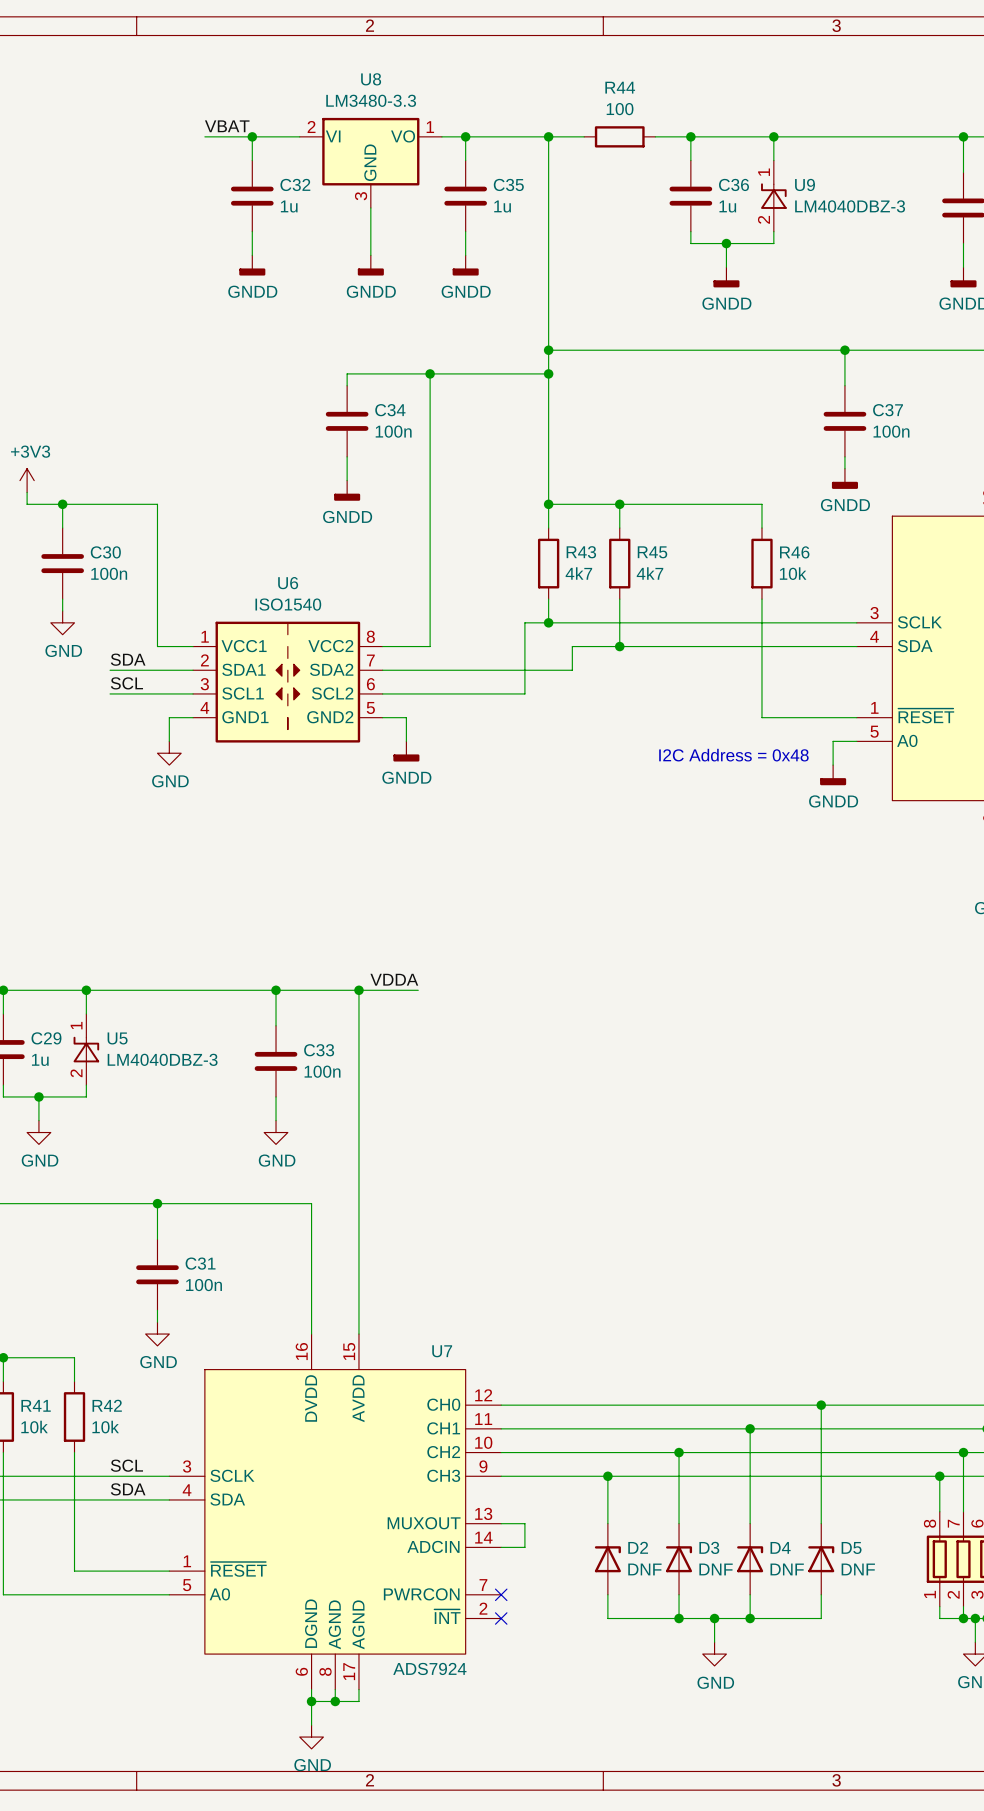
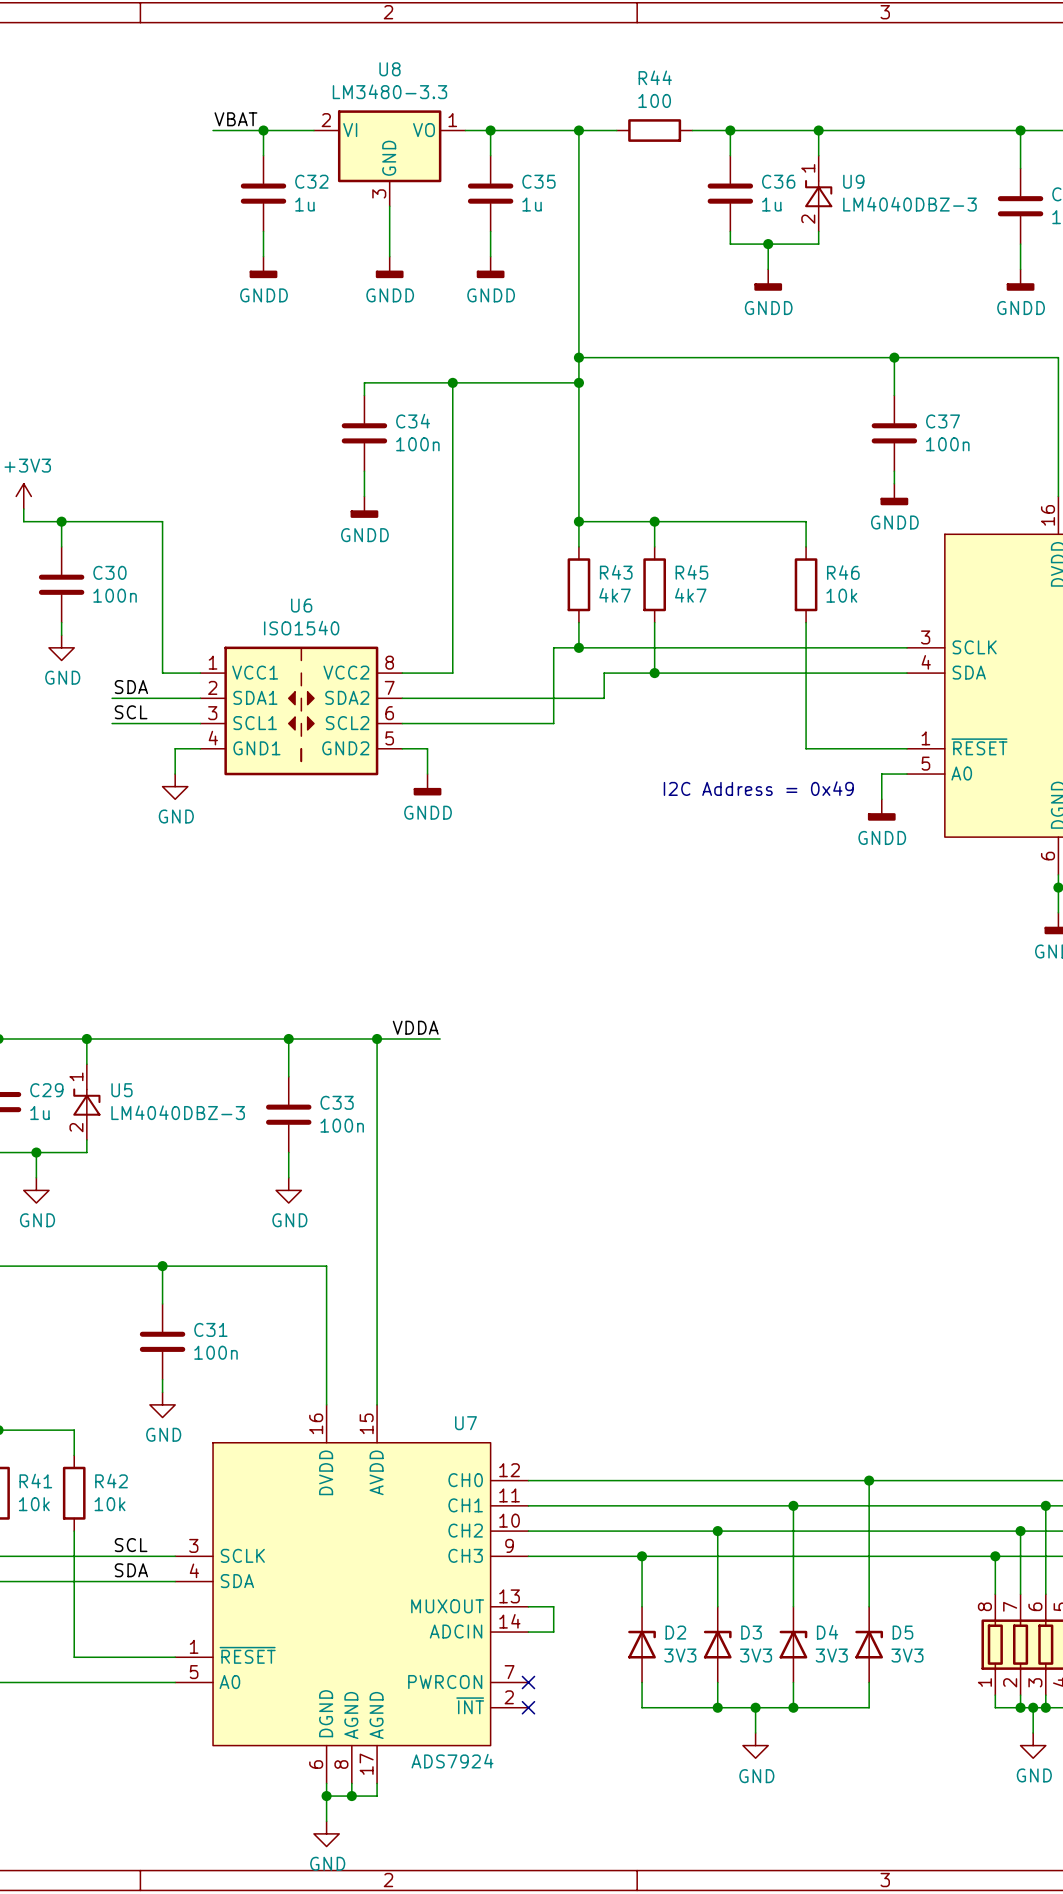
text: I2C Address = 0x48 (733, 755) -> I2C Address = 0x49 (758, 788)
D2 value: DNF (644, 1569) -> 3V3 (680, 1655)
D3 value: DNF (716, 1569) -> 3V3 (756, 1655)
D4 value: DNF (787, 1569) -> 3V3 (831, 1655)
D5 value: DNF (858, 1569) -> 3V3 (907, 1655)

